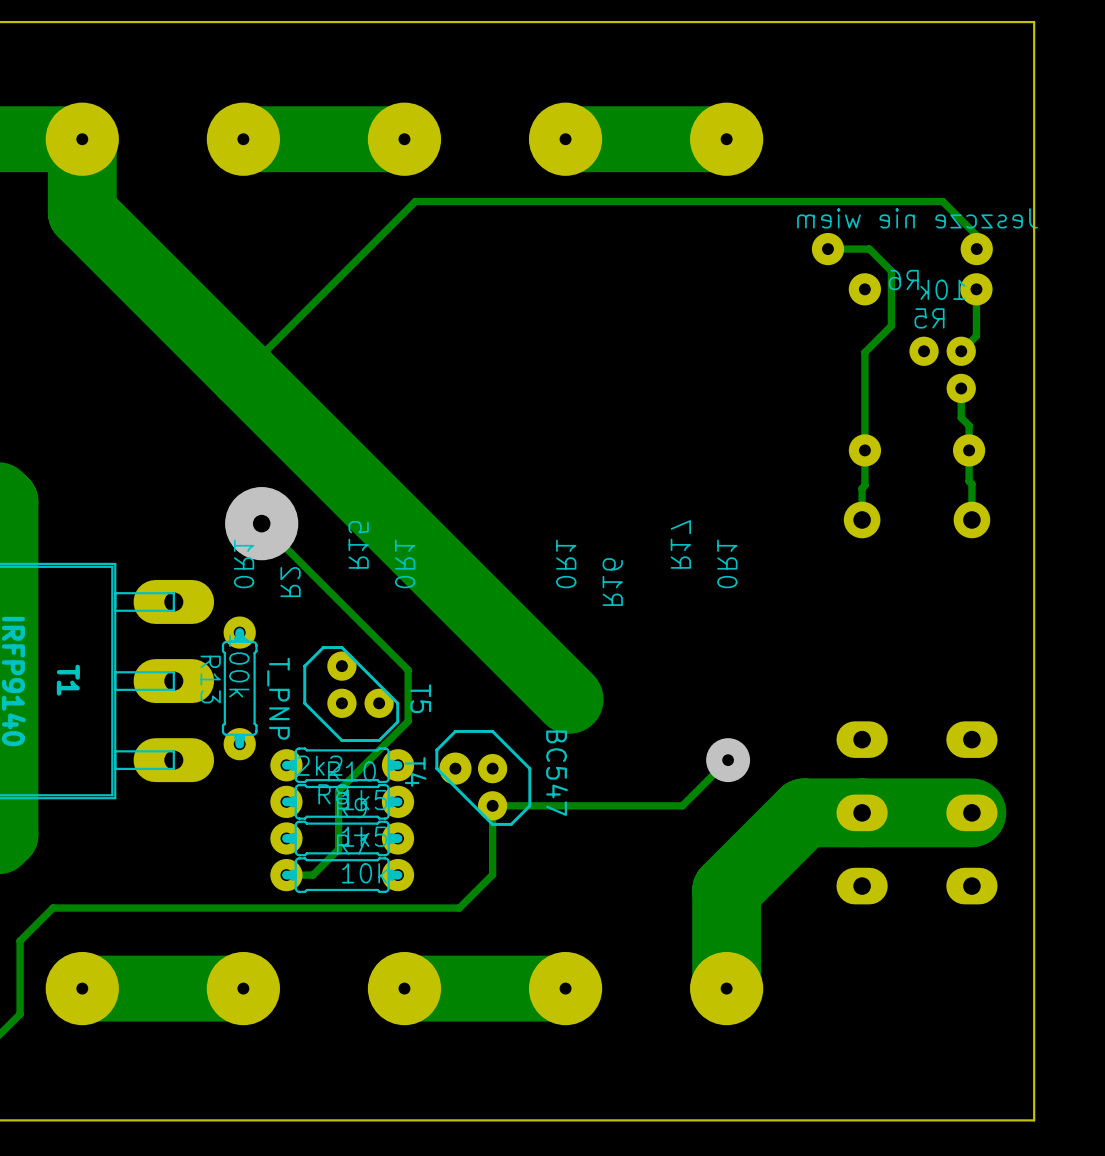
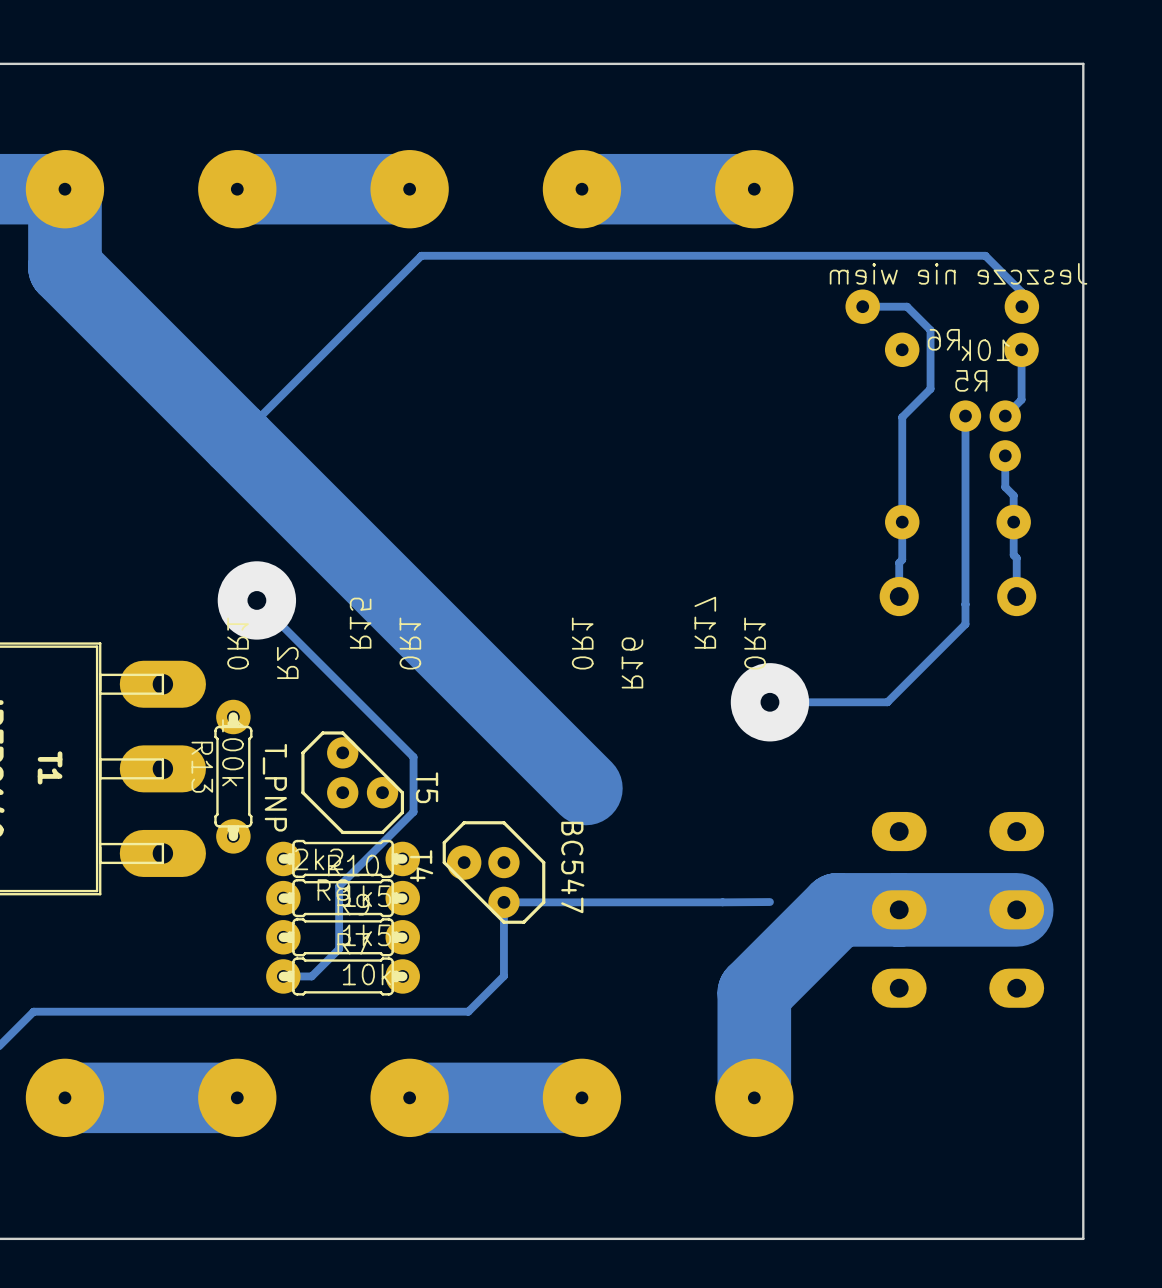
track: none -> (965, 416) (965, 624) (887, 702) (769, 702) (773, 706) (773, 717)
via: none -> (769, 702)
track: (728, 760) (682, 805) -> (769, 902) (706, 902)
via: (728, 760) -> none

